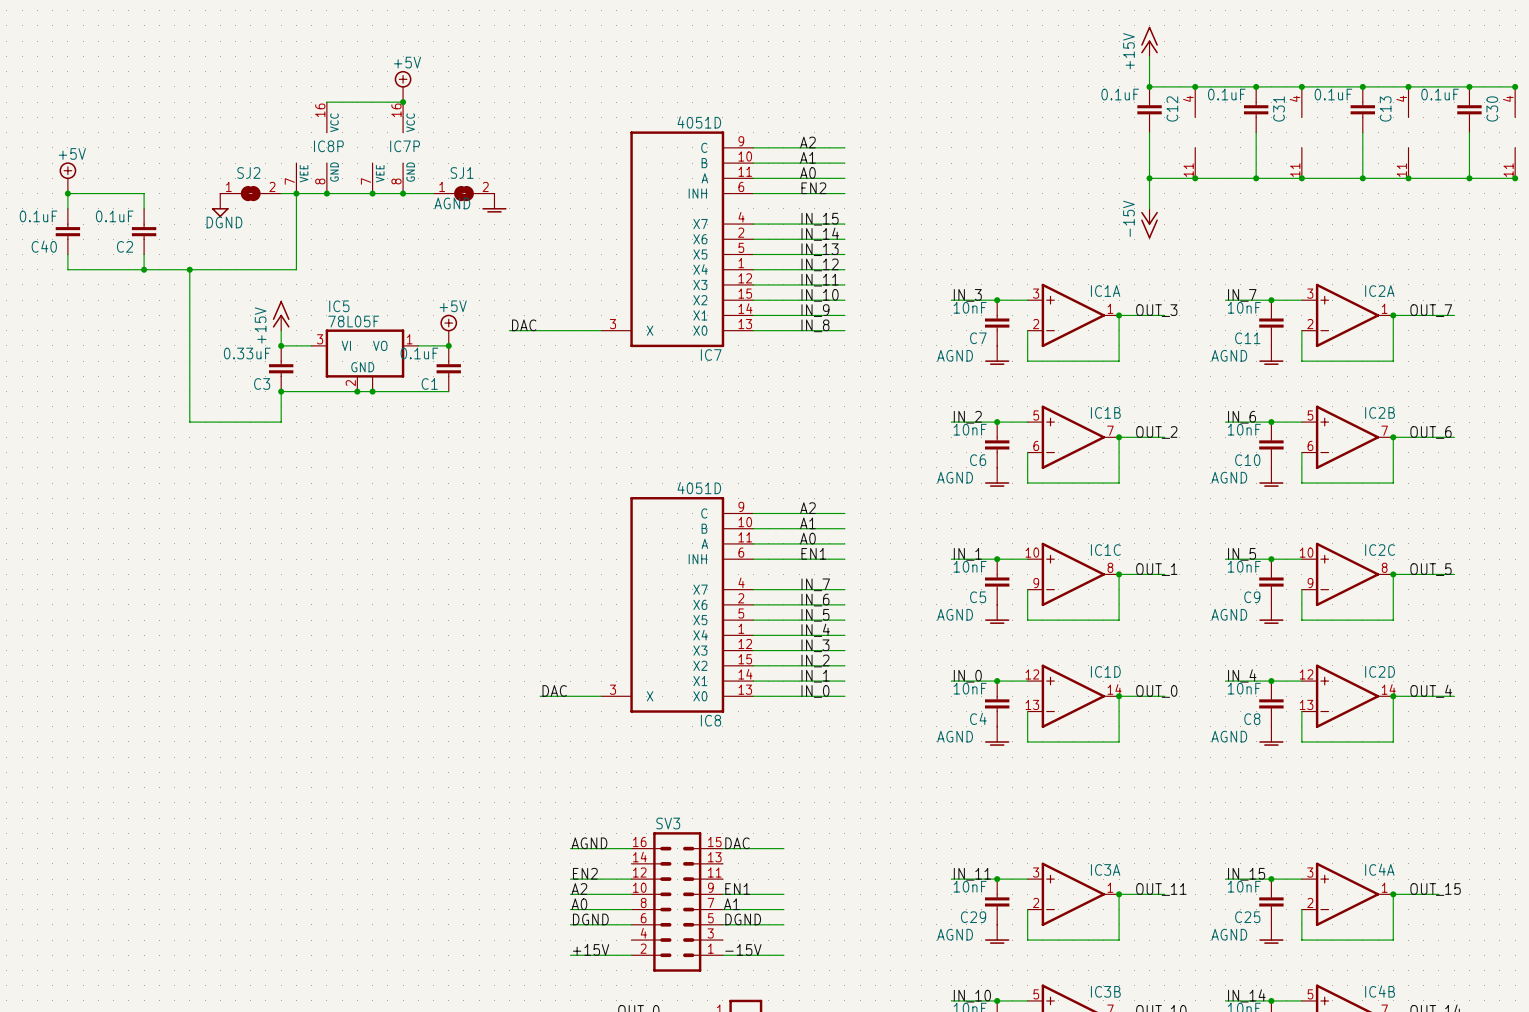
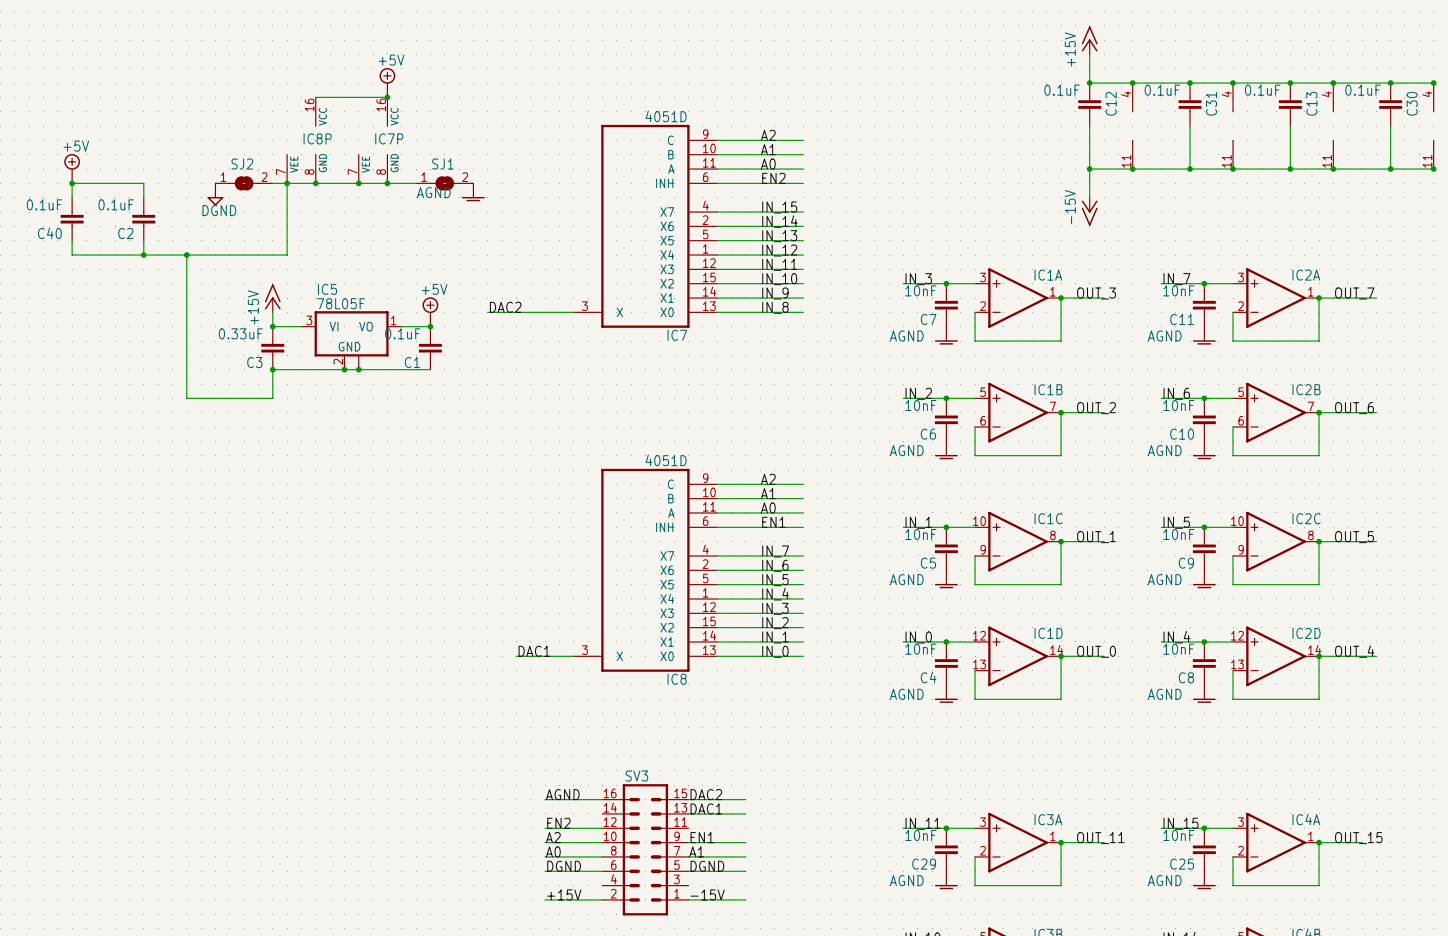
label: DAC (524, 325) -> DAC2 (505, 307)
label: DAC (554, 690) -> DAC1 (534, 651)
label: DAC (737, 843) -> DAC2 (706, 794)
label: none -> DAC1 (706, 808)
wire: none -> (688, 813) (745, 813)

